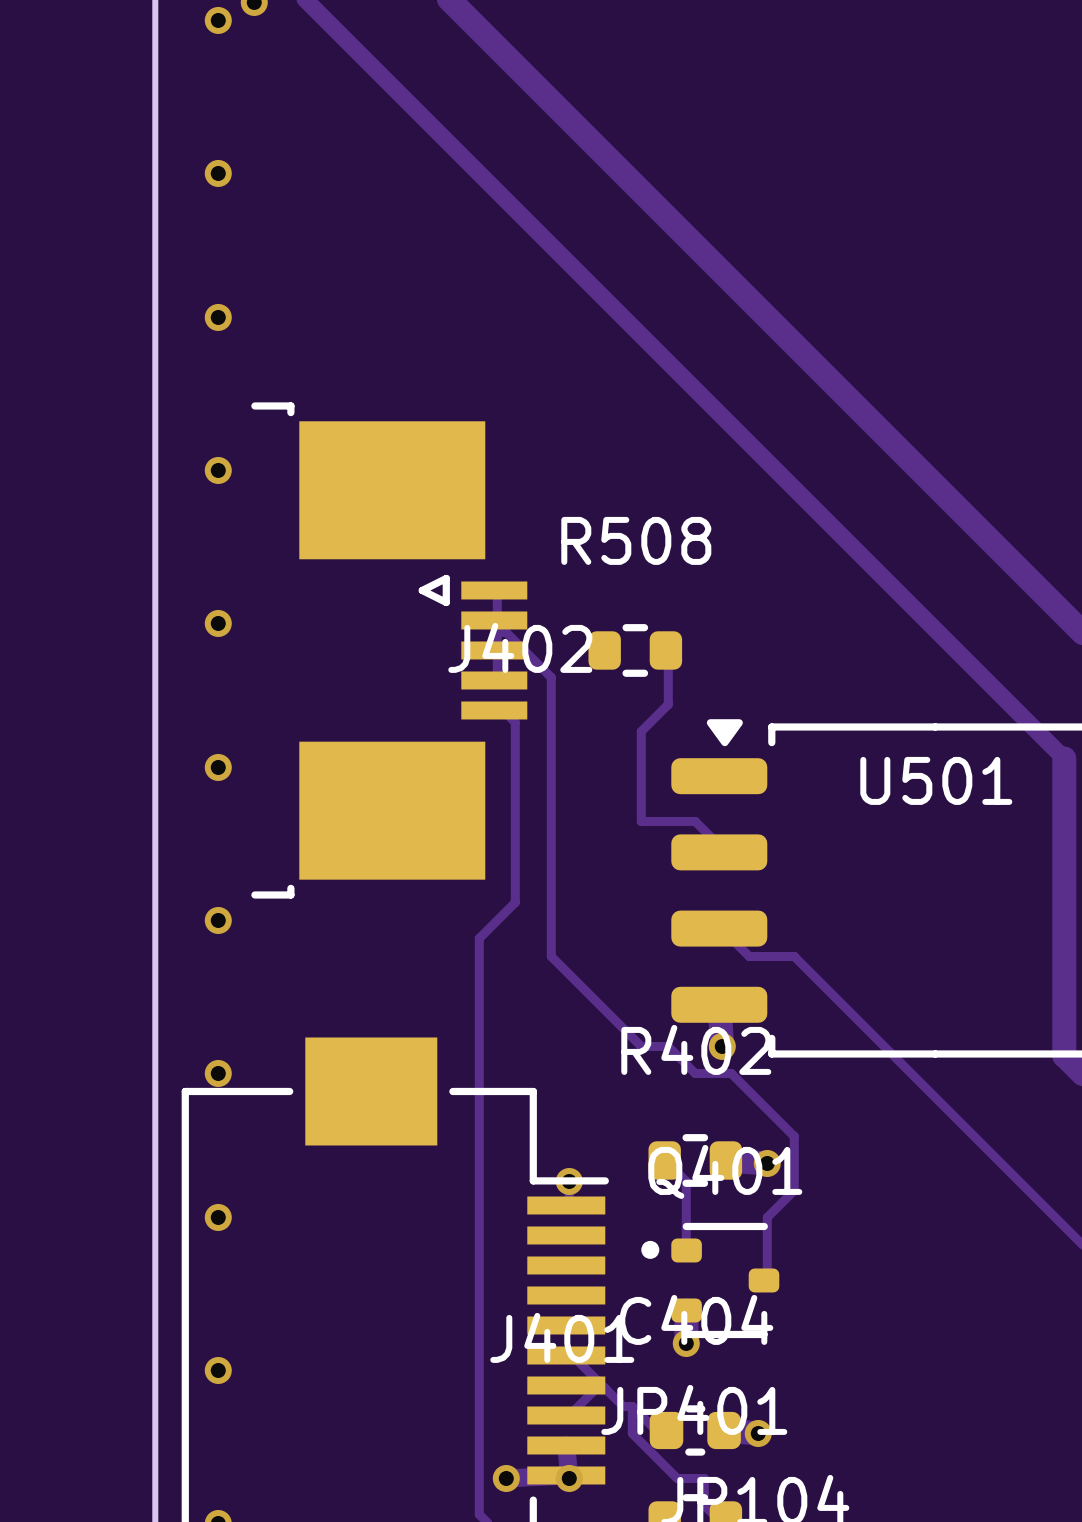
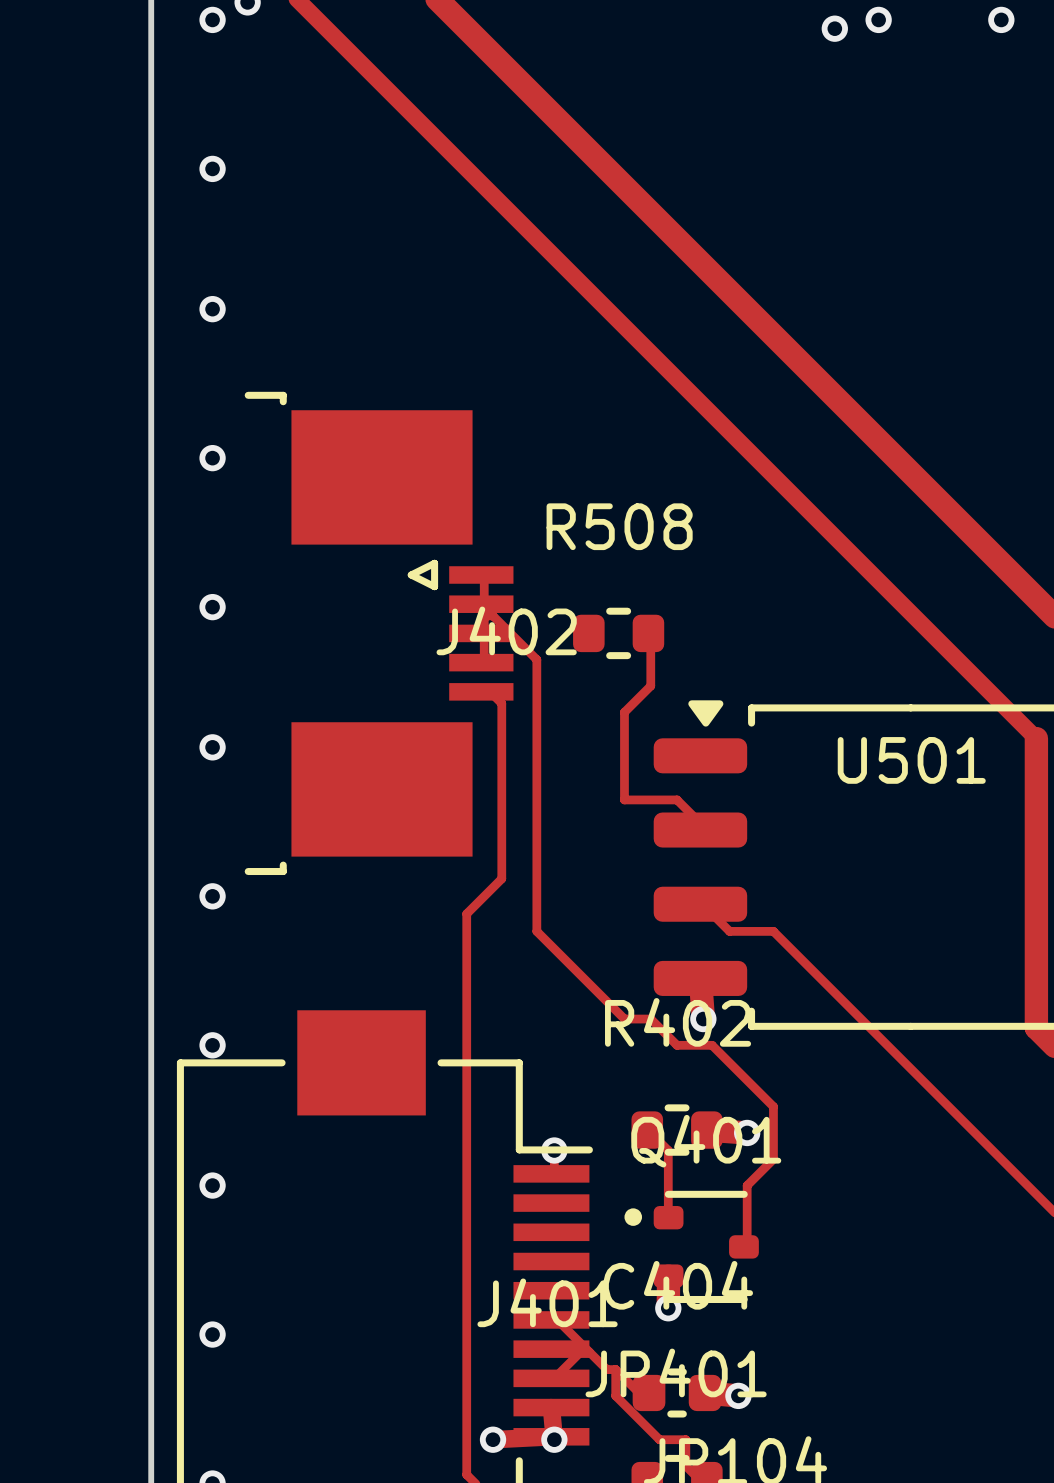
via: none -> (878, 19)
via: none -> (1001, 19)
via: none -> (834, 28)

